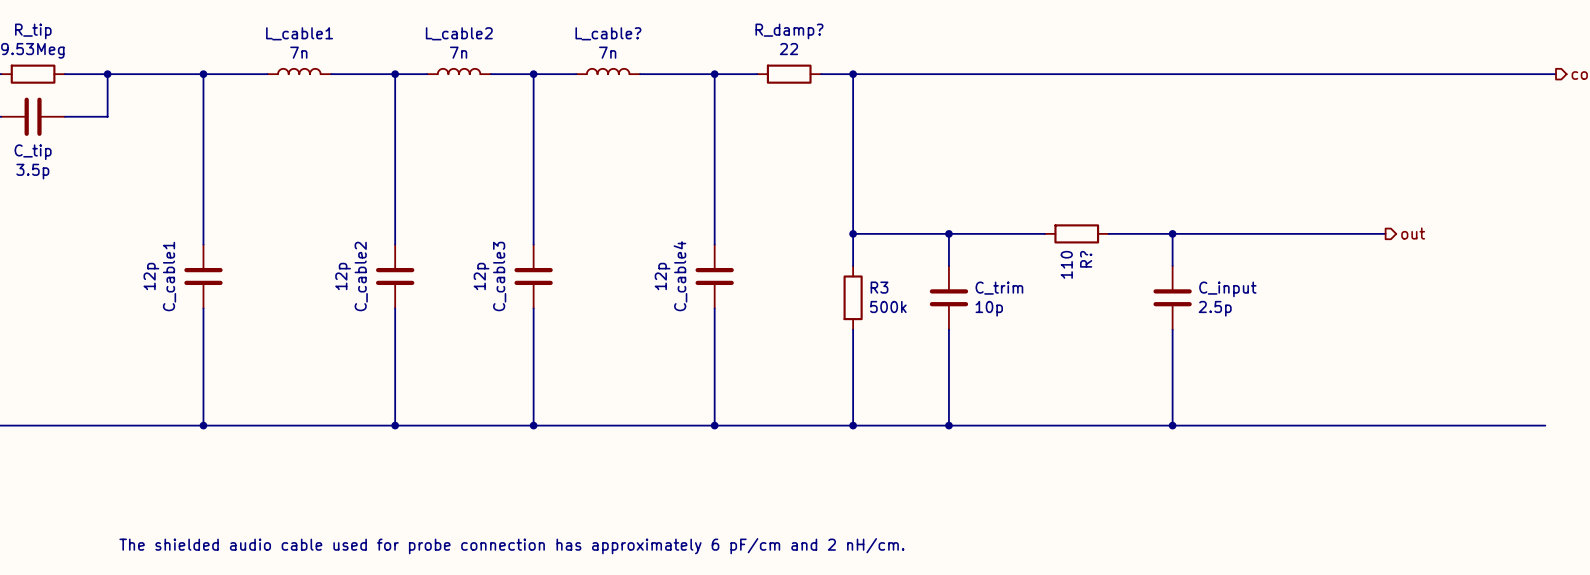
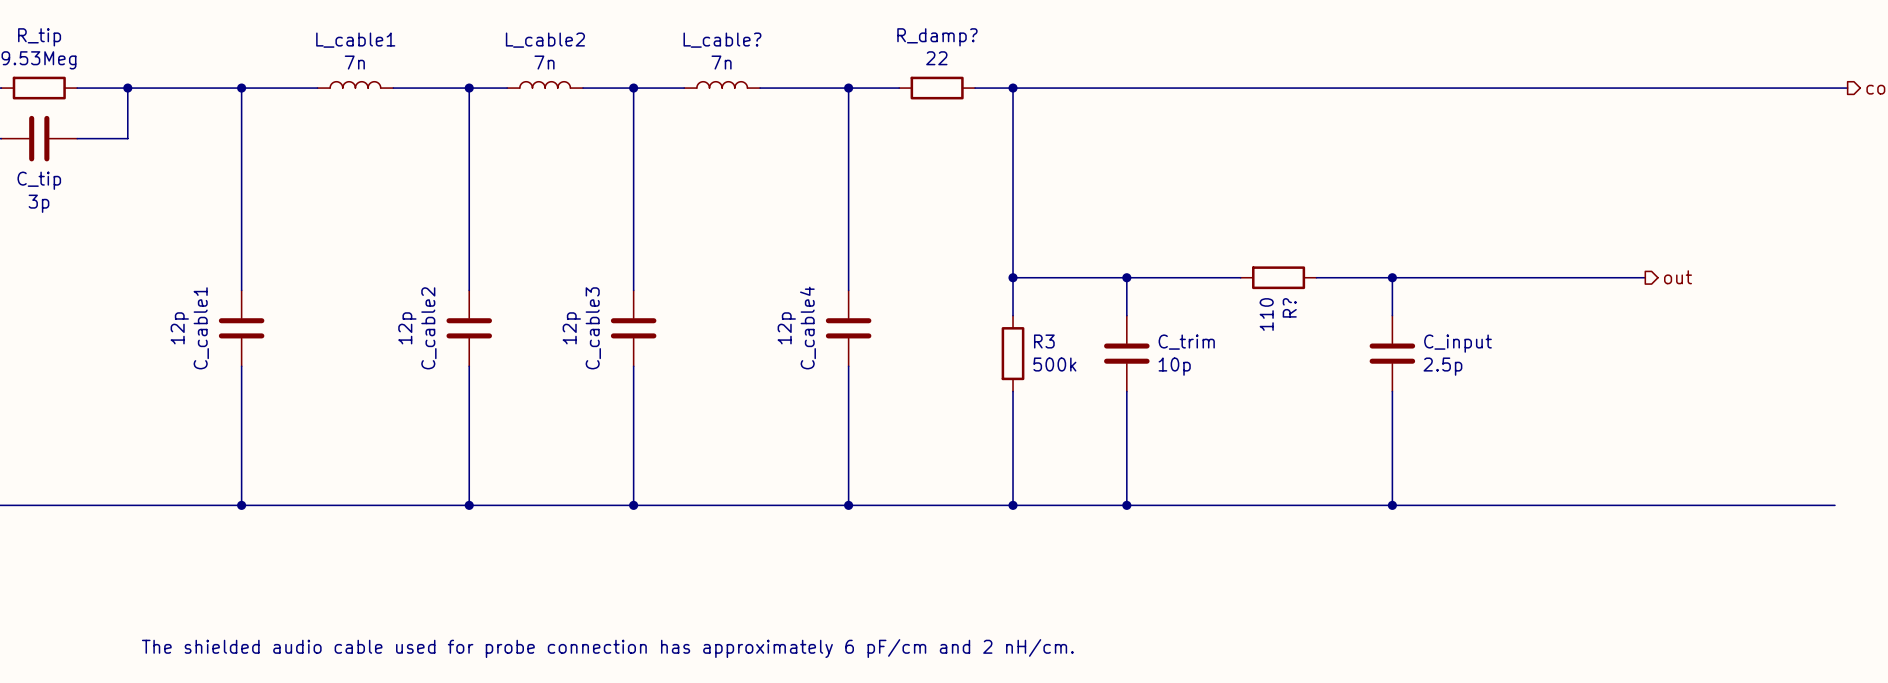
C_tip value: 3.5p (32, 171) -> 3p (38, 203)

